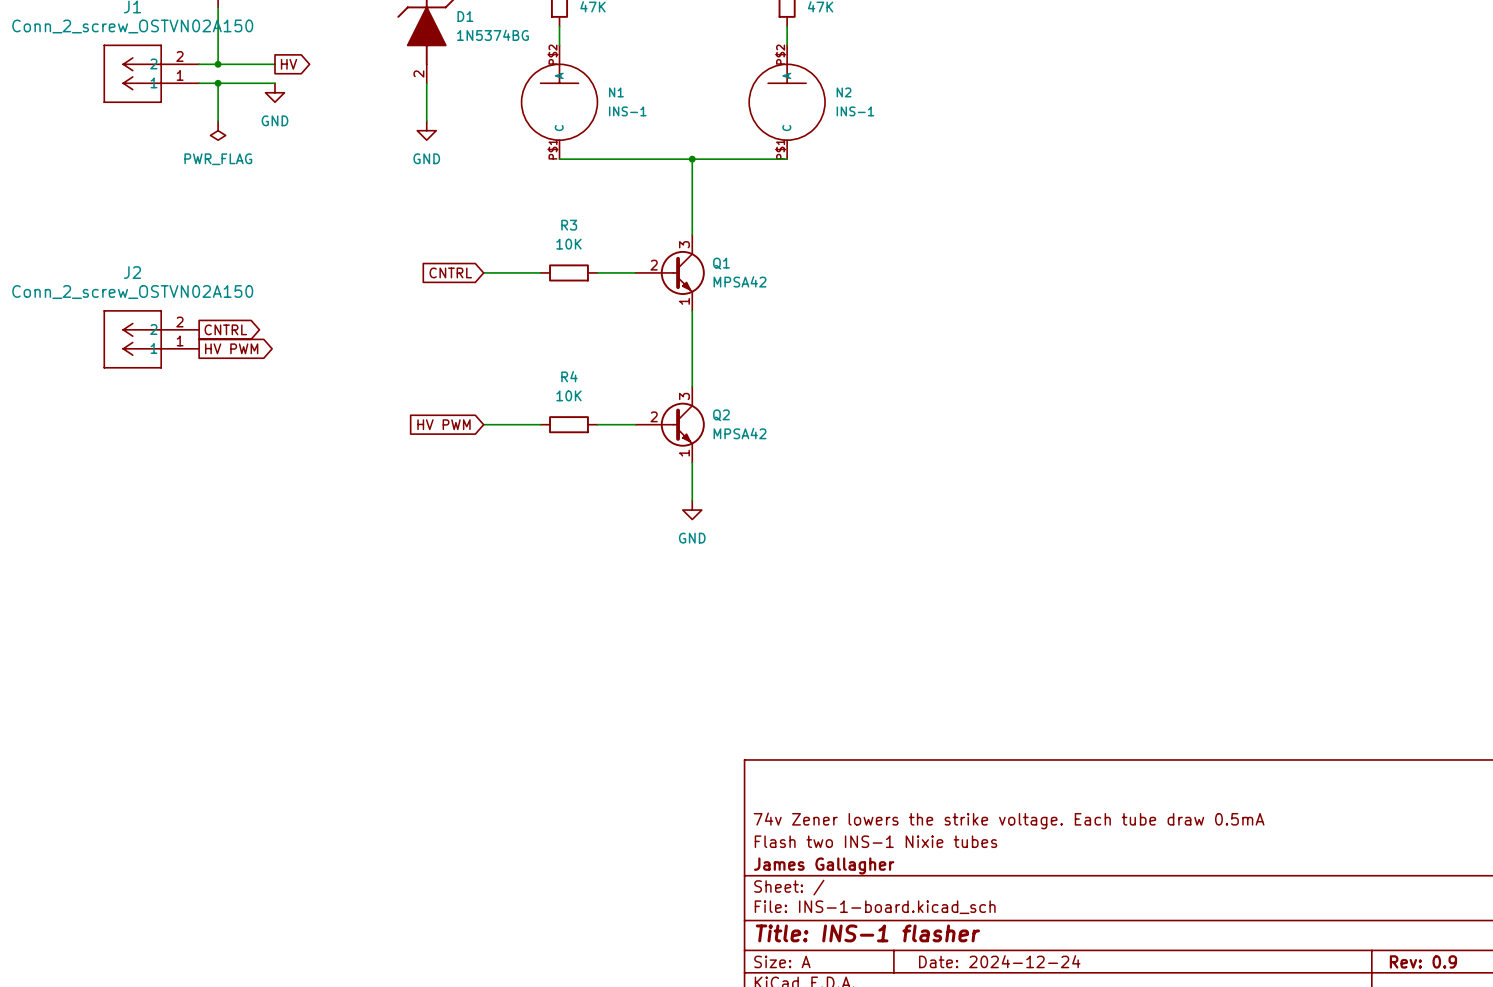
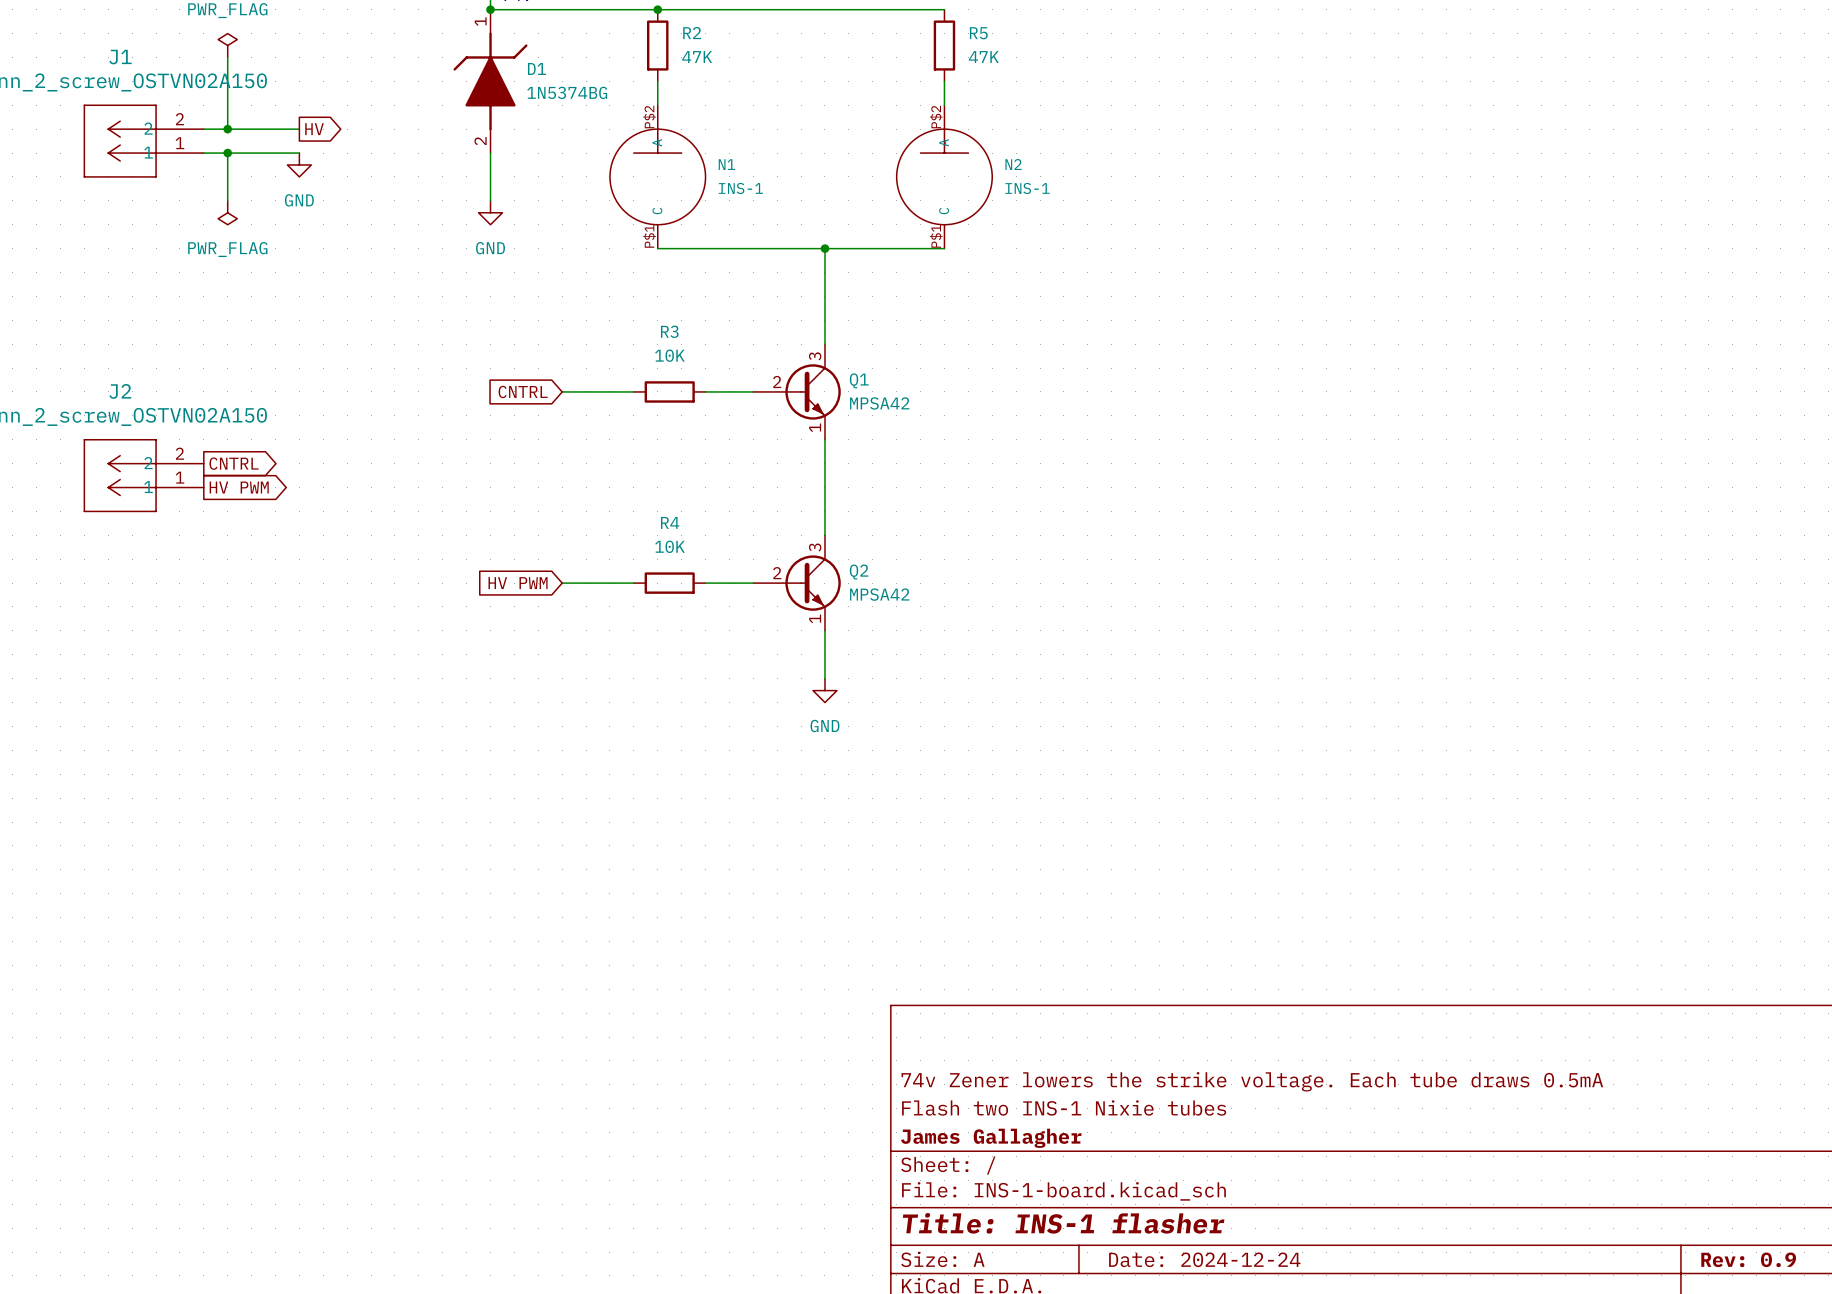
title block: 74v Zener lowers the strike voltage. Each tube draw 0.5mA (1009, 820) -> 74v Zener lowers the strike voltage. Each tube draws 0.5mA (1252, 1081)

